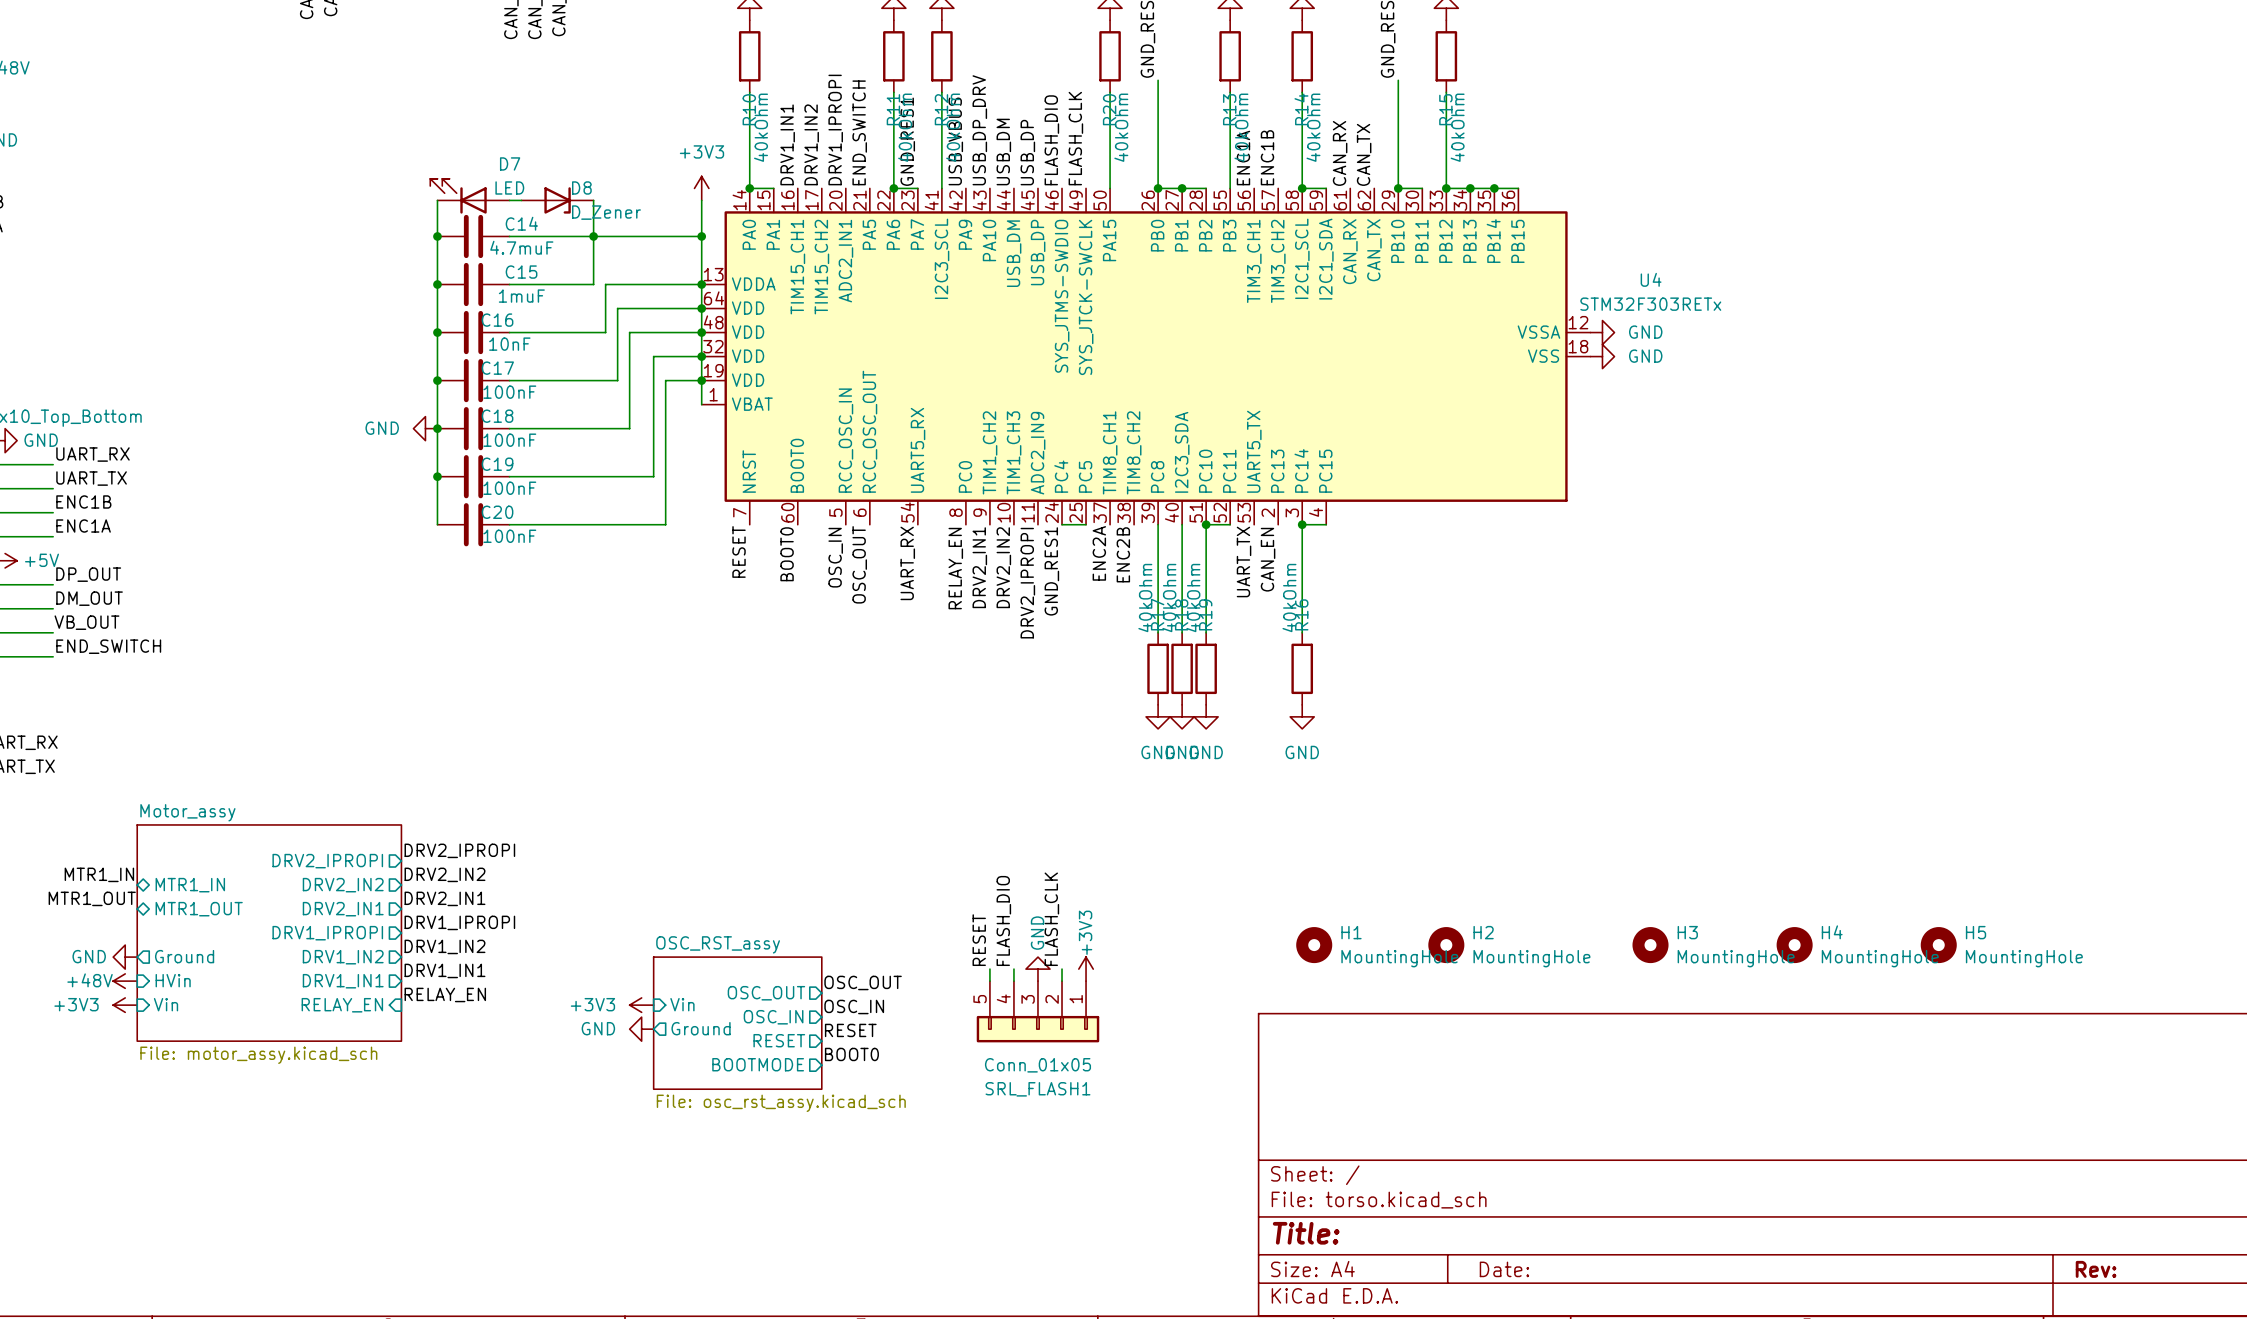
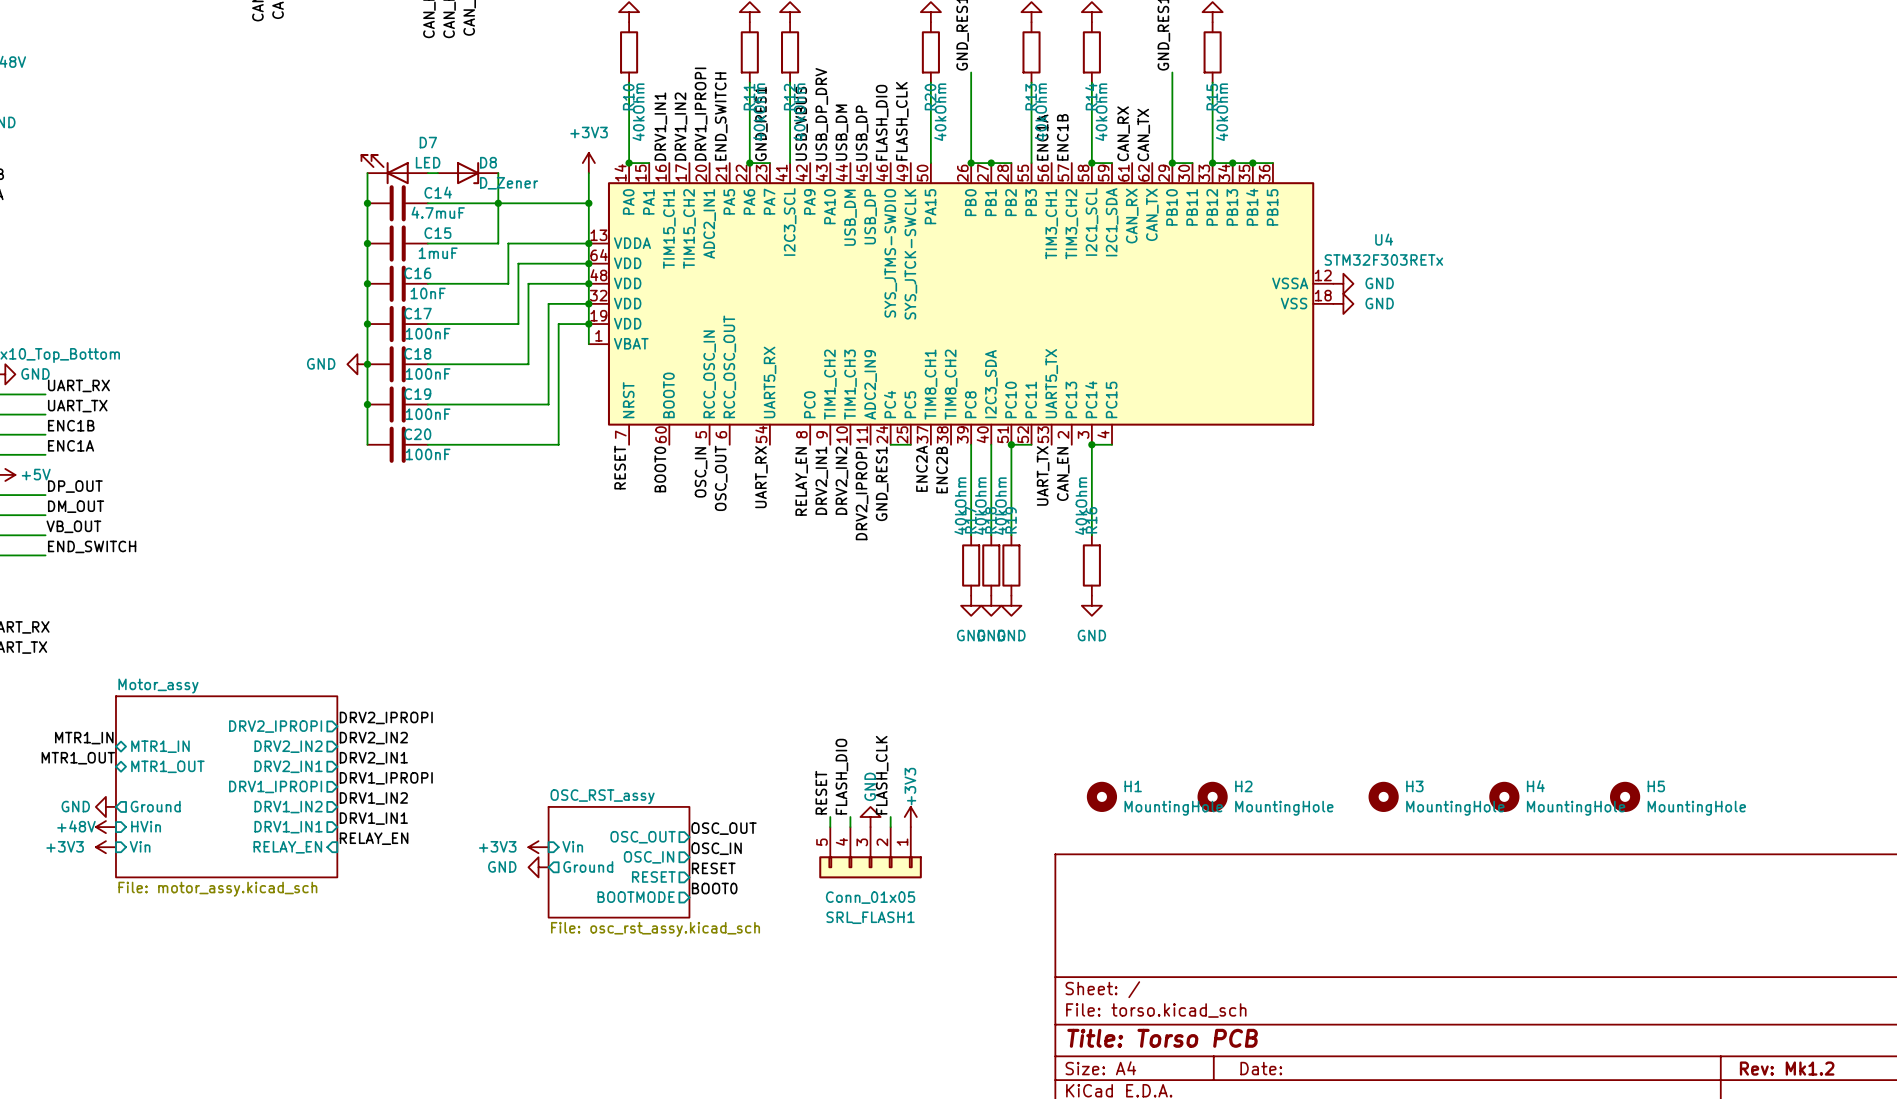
title block: Title: (1306, 1233) -> Title: Torso PCB (1162, 1038)
title block: Rev: (2096, 1269) -> Rev: Mk1.2 (1787, 1068)

